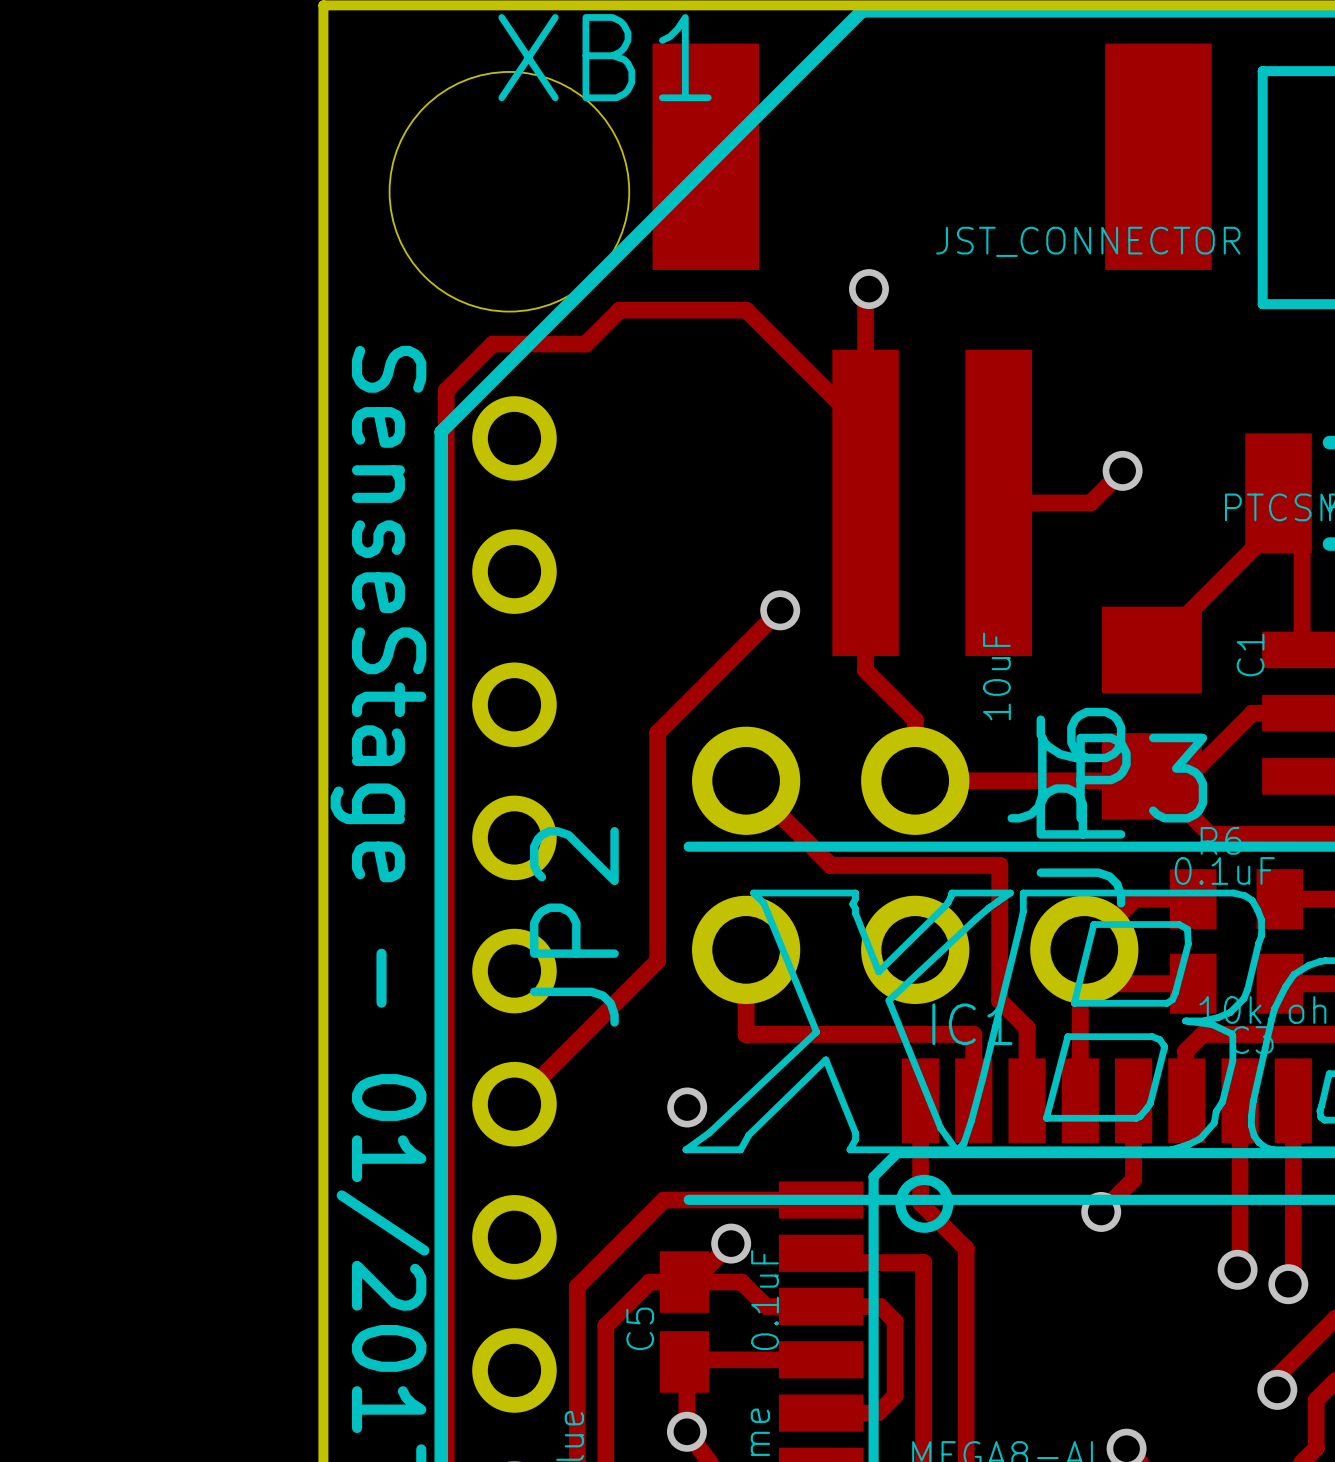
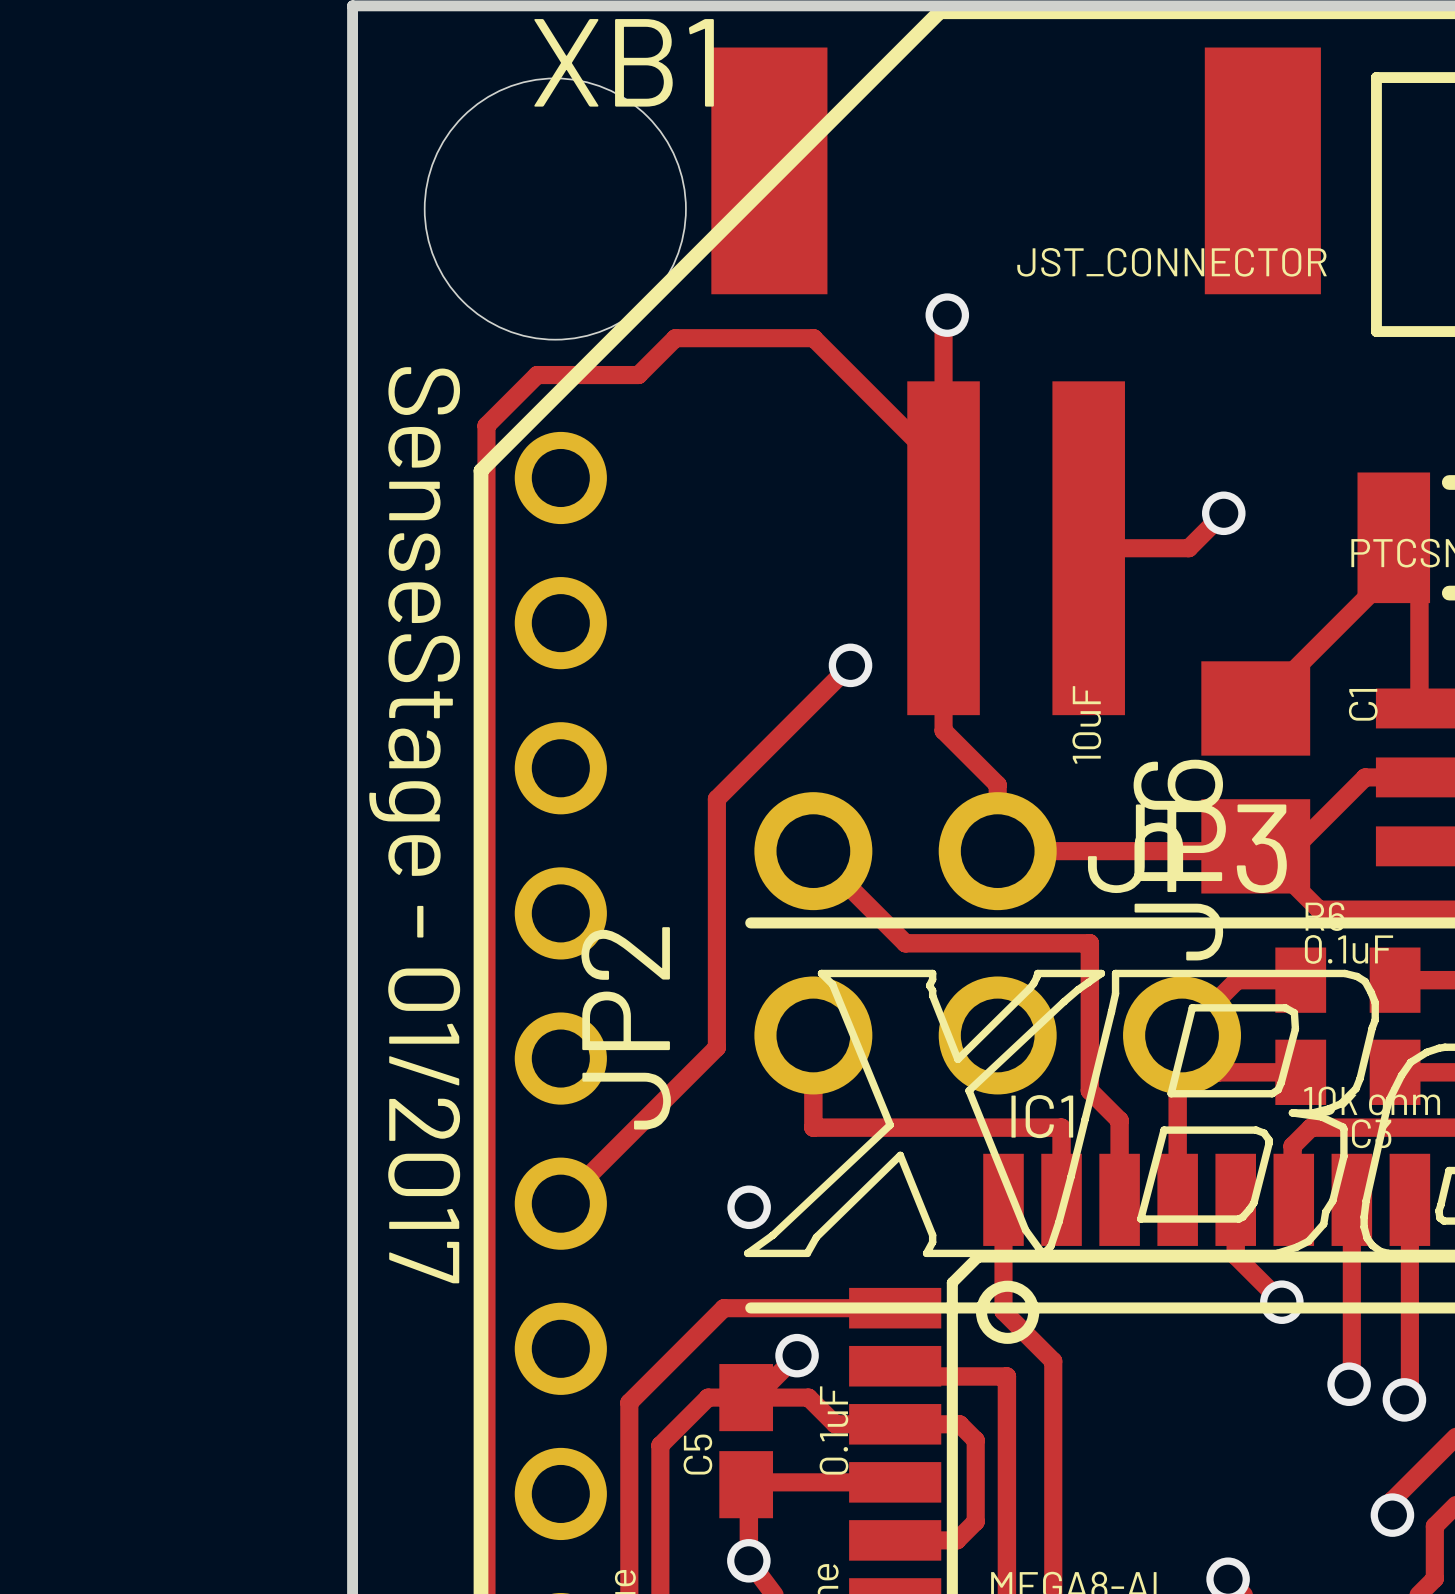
track: (1133, 1152) (1133, 1179) (1101, 1211) -> (1235, 1256) (1281, 1302)
via position: (1101, 1211) -> (1281, 1302)

